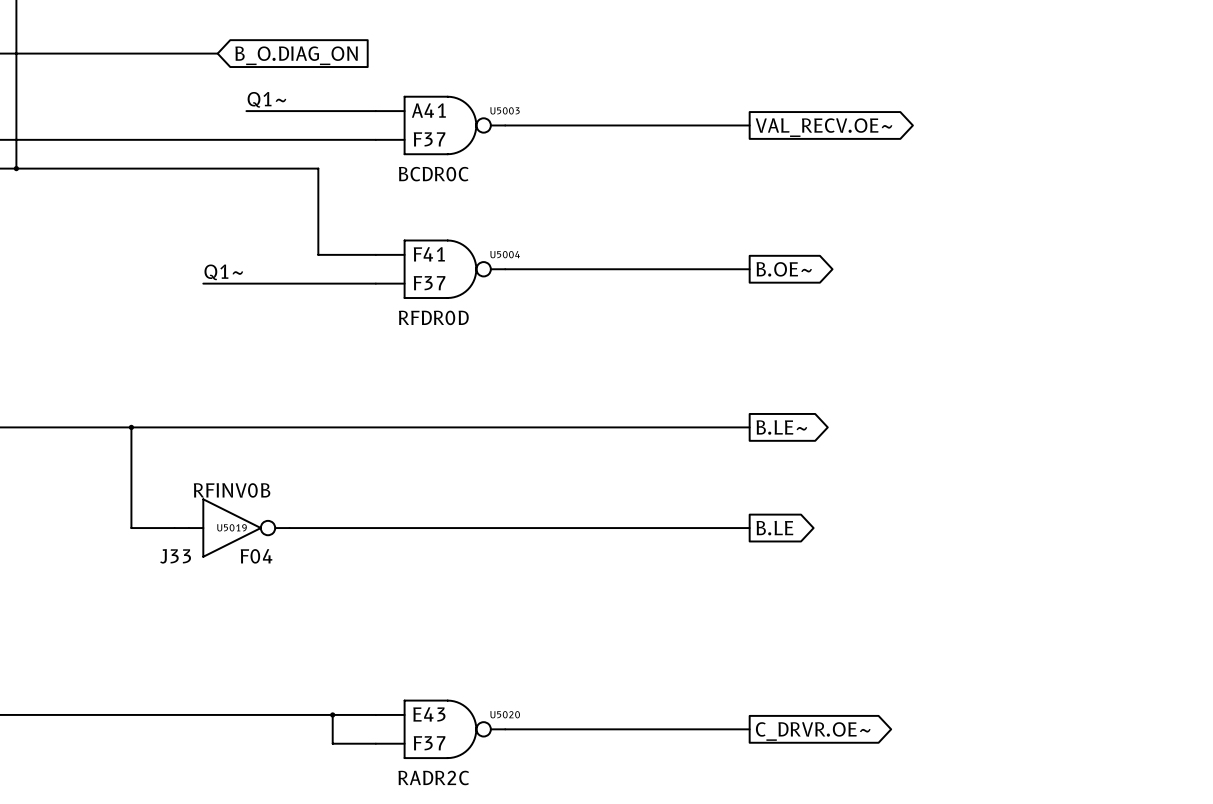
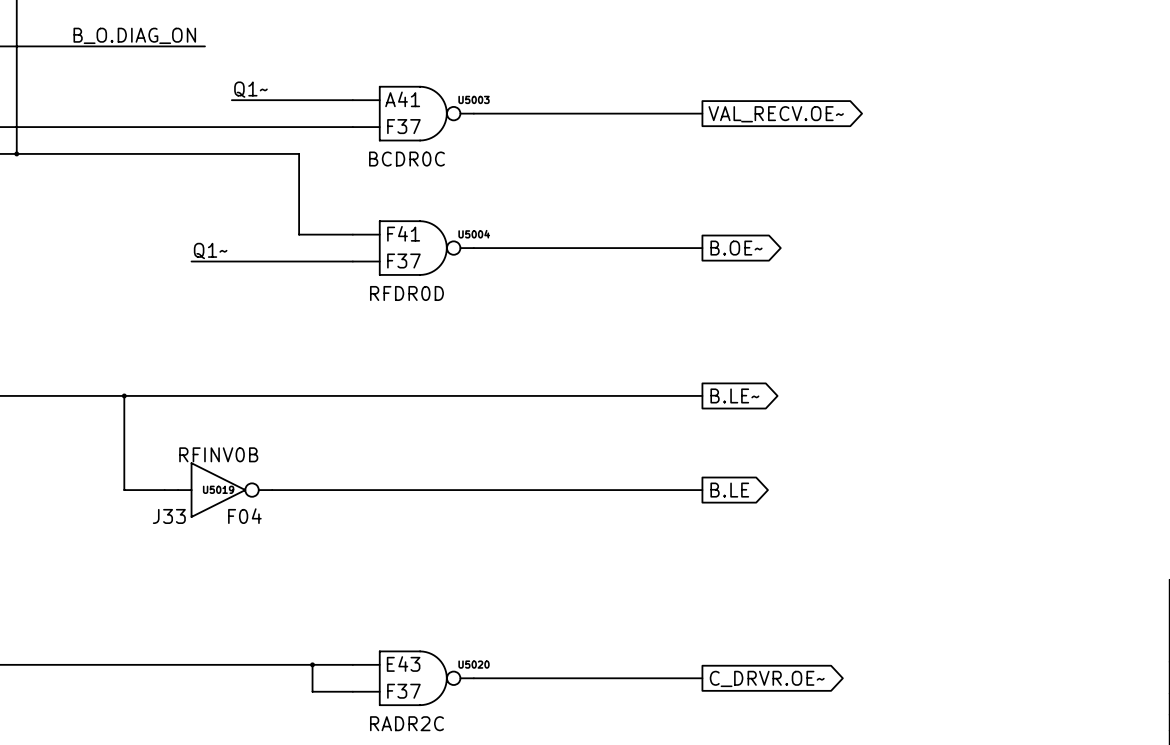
label: none -> B_O.DIAG_ON (134, 35)
global label: B_O.DIAG_ON (296, 55) -> none

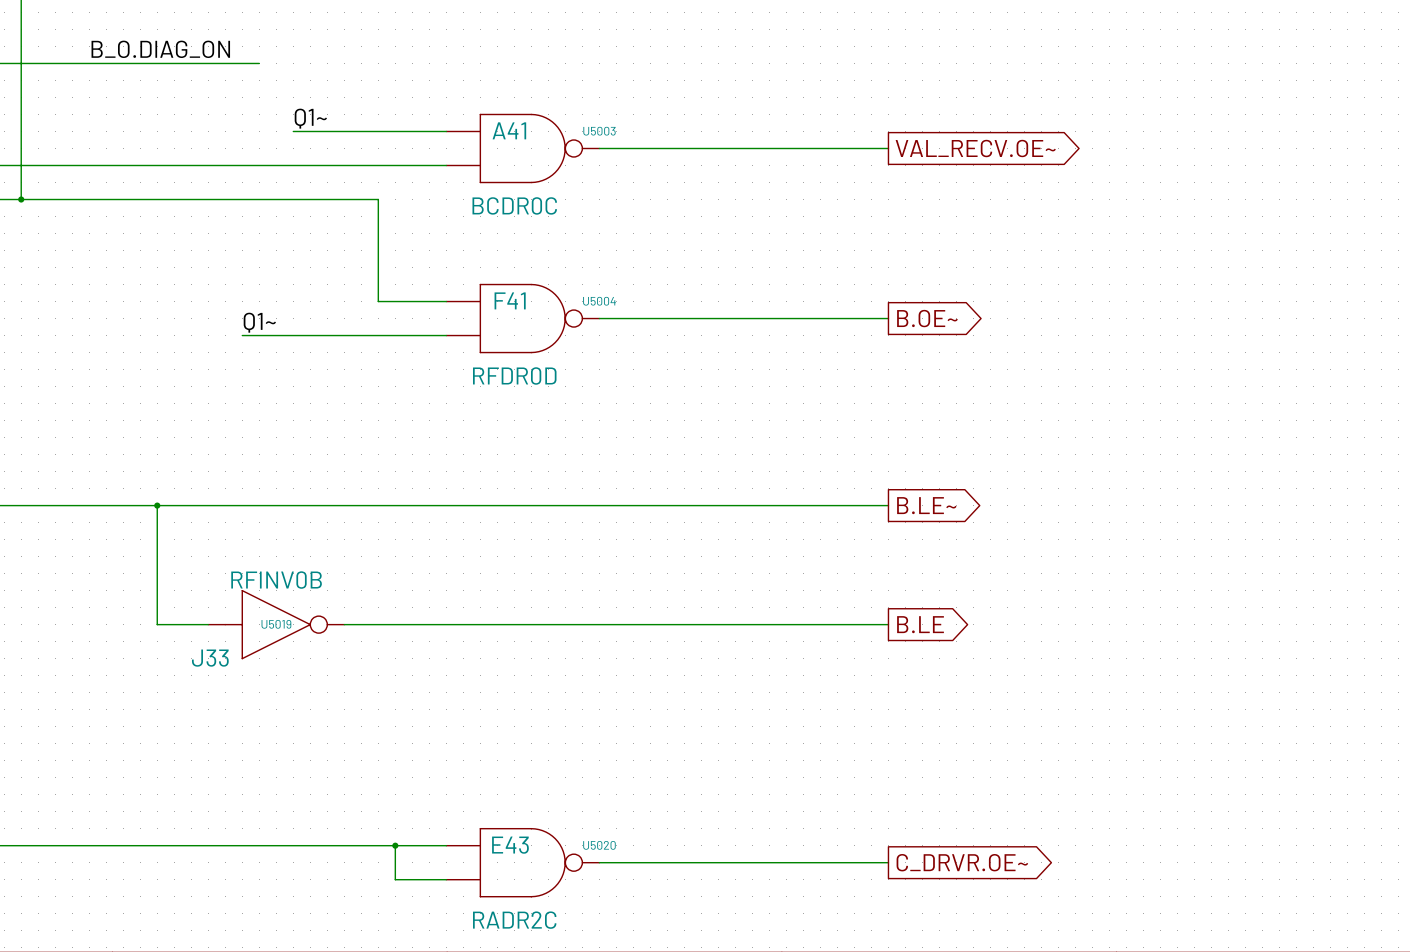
U5003 value: F37 (403, 126) -> none
U5004 value: F37 (403, 261) -> none
U5019 value: F04 (244, 516) -> none
U5020 value: F37 (403, 691) -> none

